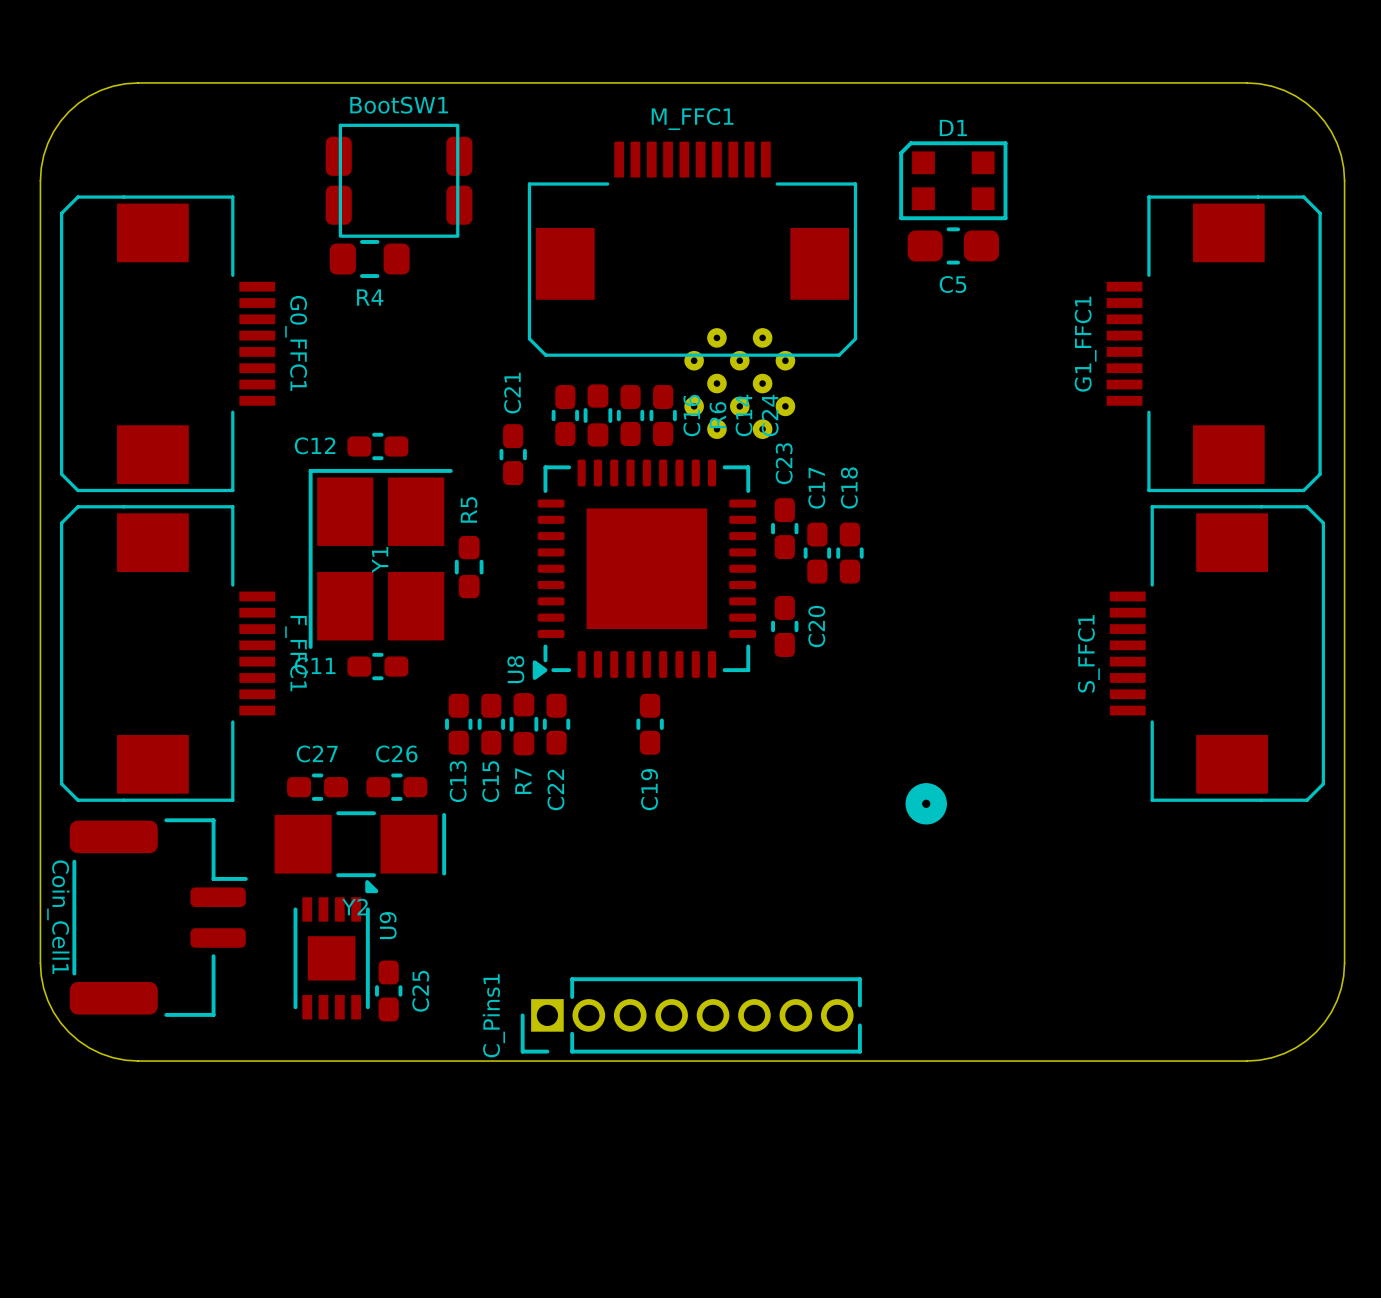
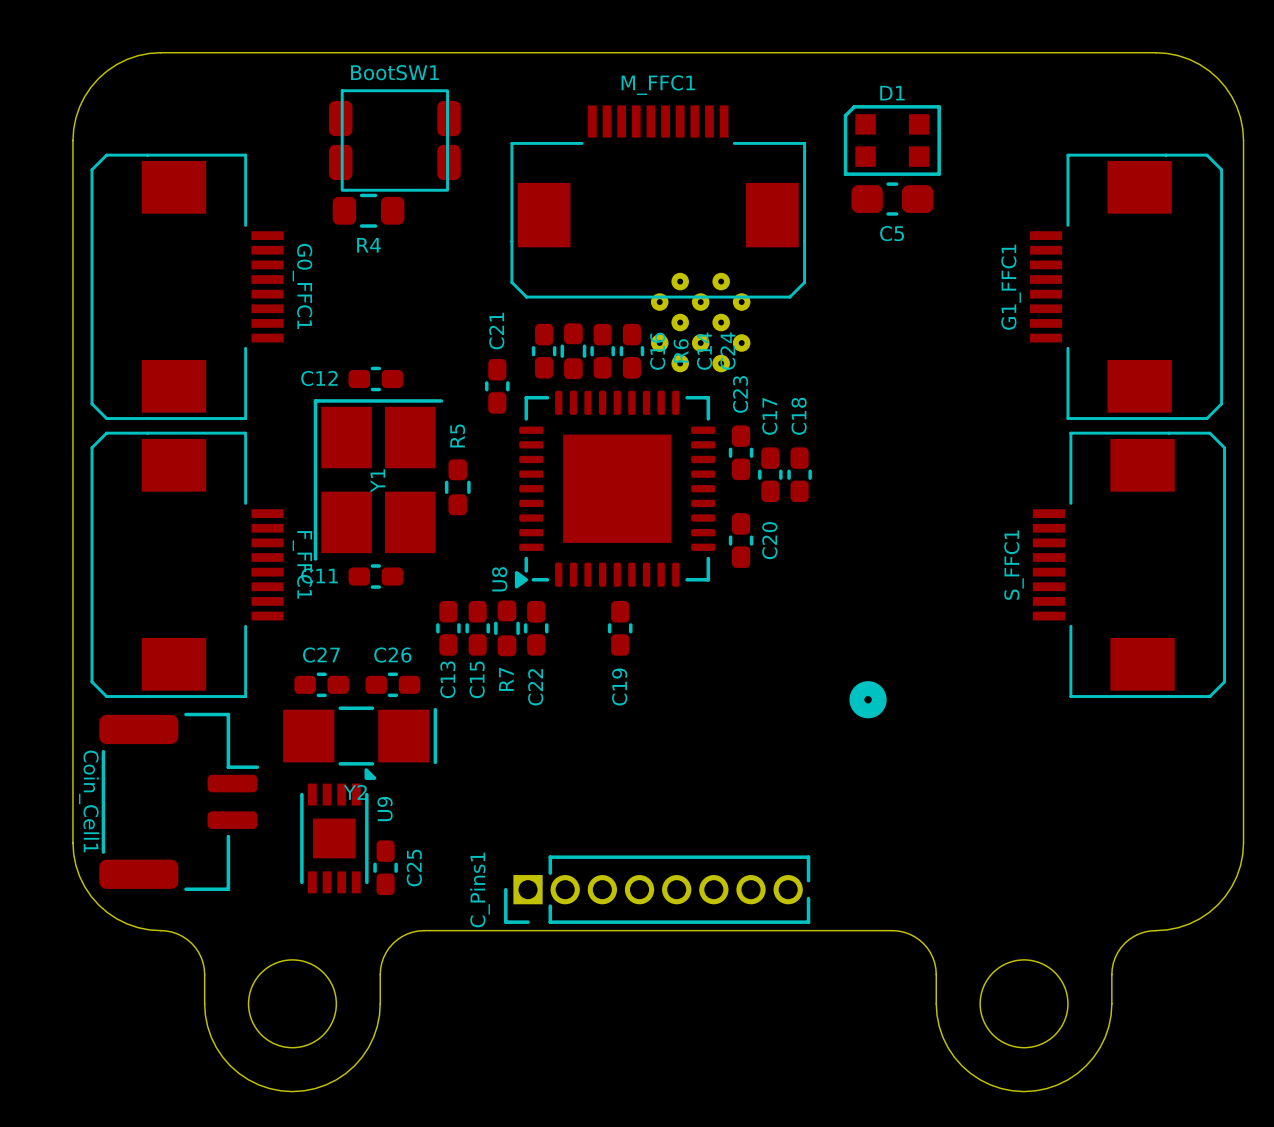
board edge: (138, 1061) (431, 1061) -> (160, 930) (182, 936) (195, 947) (201, 957) (204, 968) (204, 1003) (207, 1026) (222, 1057) (239, 1073) (258, 1084) (292, 1091) (326, 1084) (345, 1073) (362, 1057) (377, 1026) (380, 1003) (380, 968) (383, 957) (397, 939) (407, 933) (424, 930)
board edge: (953, 1061) (1246, 1061) -> (892, 930) (903, 932) (919, 939) (932, 957) (935, 968) (936, 1003) (939, 1026) (954, 1057) (970, 1073) (990, 1084) (1024, 1091) (1057, 1084) (1077, 1073) (1093, 1057) (1108, 1026) (1111, 1003) (1112, 968) (1115, 957) (1129, 939) (1138, 933) (1155, 930)
round board edge: none -> [247, 959, 338, 1049]
round board edge: none -> [979, 959, 1069, 1049]

